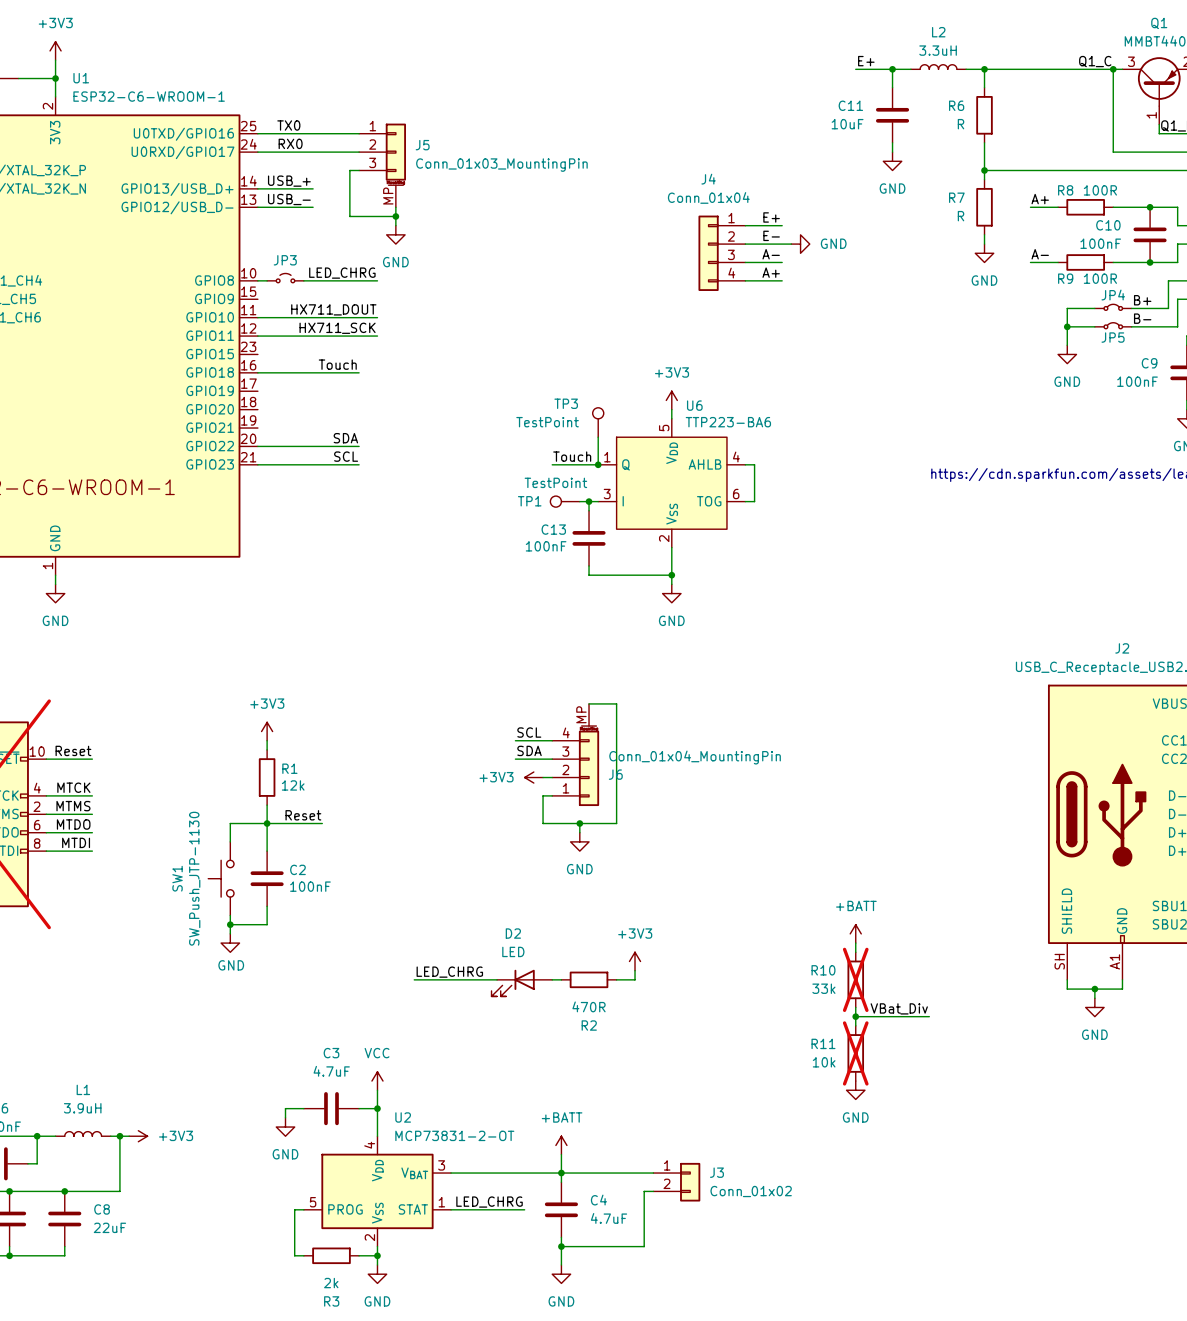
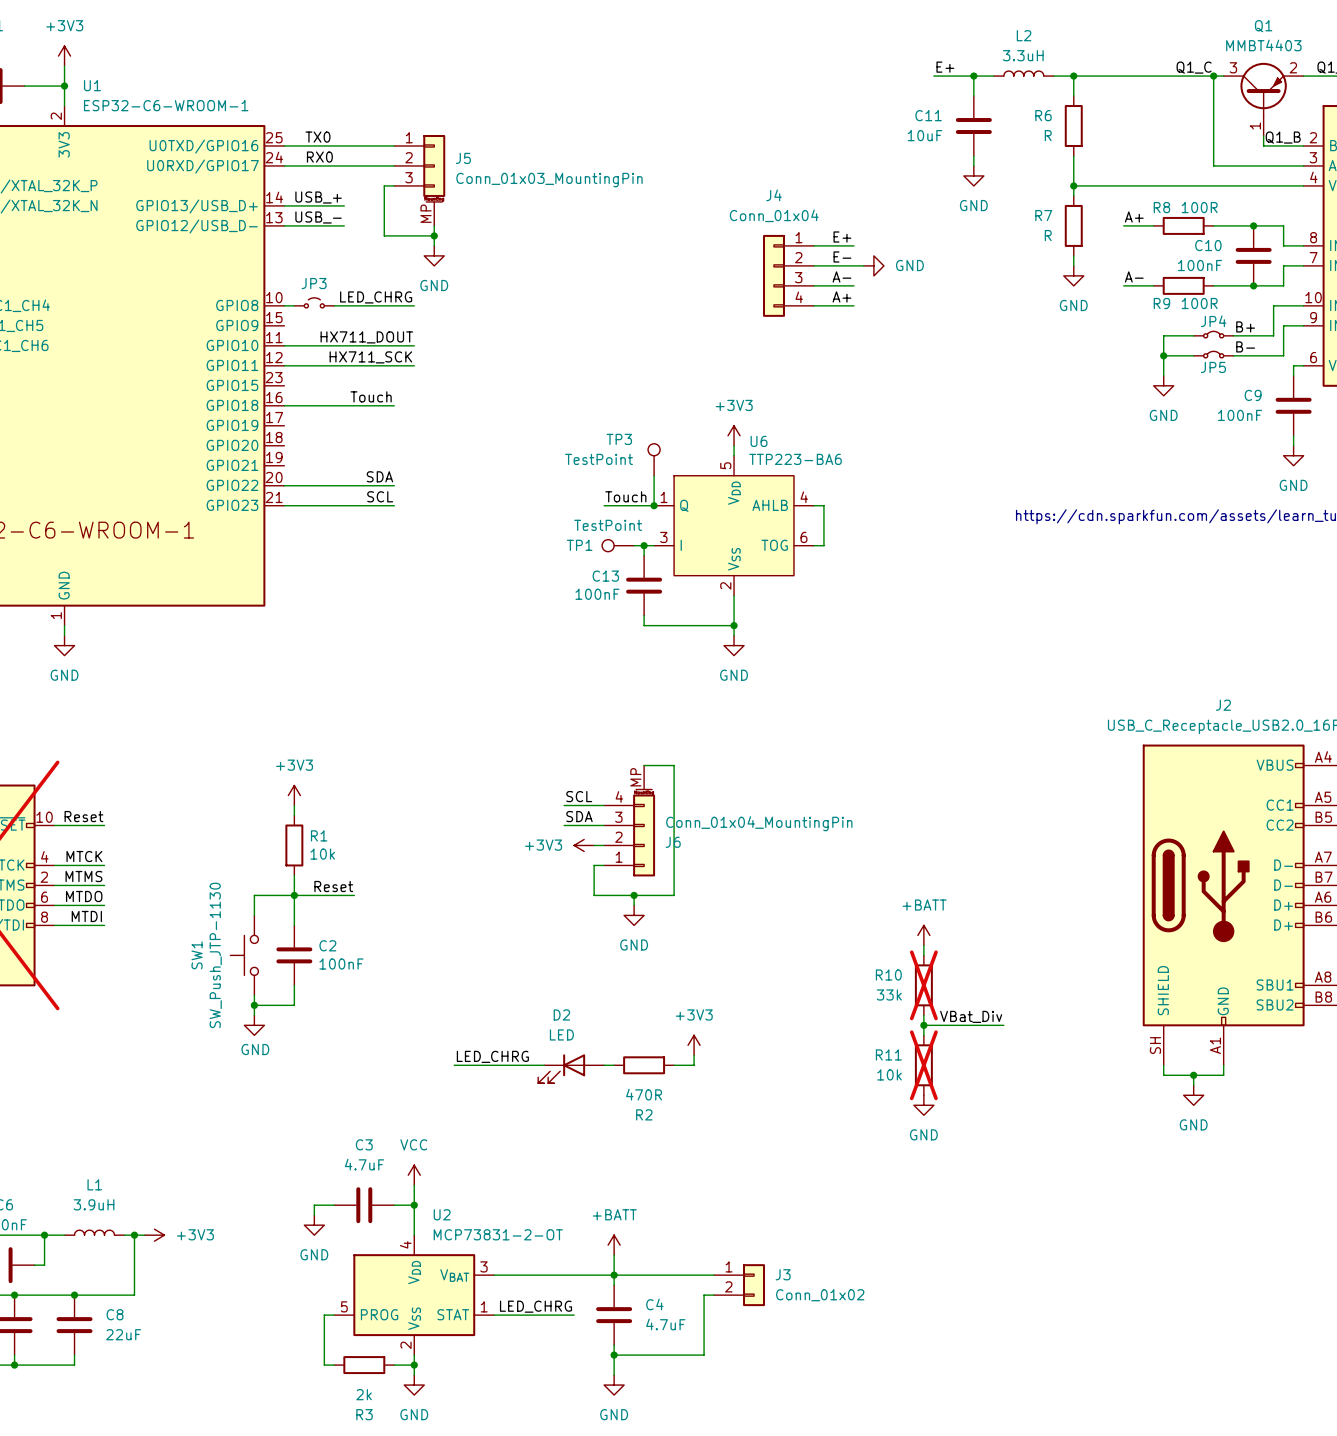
R1 value: 12k (293, 785) -> 10k (322, 854)
power symbol position: +BATT (855, 933) -> +BATT (923, 935)
junction: none -> (923, 1025)
wire: (855, 943) (855, 952) -> (923, 945) (923, 955)
R10 position: (855, 979) -> (923, 985)
wire: (855, 1007) (855, 1025) -> (923, 1015) (923, 1035)
label position: VBat_Div (899, 1008) -> VBat_Div (971, 1016)
wire: (855, 1016) (929, 1016) -> (923, 1025) (1003, 1025)
junction: (855, 1016) -> none
R11 position: (855, 1053) -> (923, 1065)
power symbol position: GND (855, 1090) -> GND (923, 1105)

